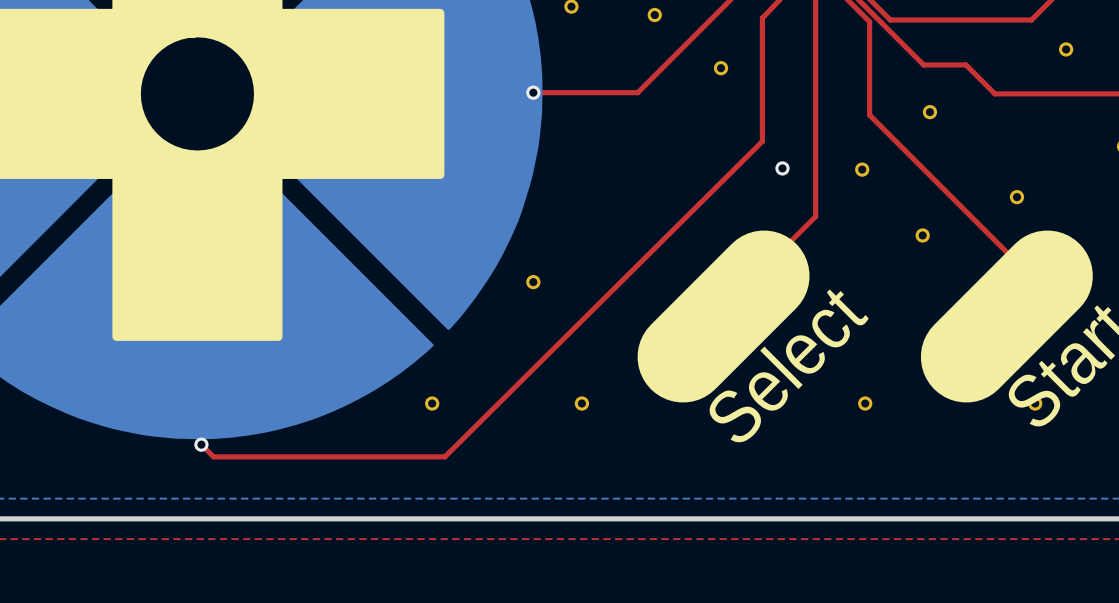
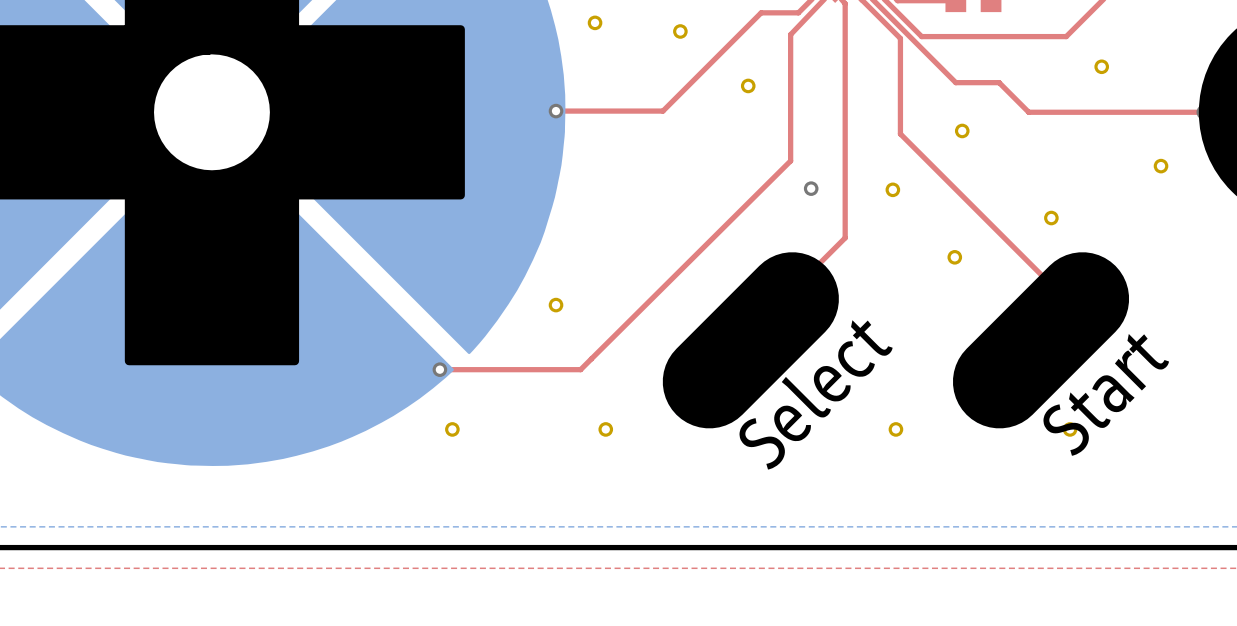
top track: (567, 334) (444, 456) (213, 456) (201, 444) -> (591, 358) (580, 369) (439, 369)
via: none -> (439, 369)
via: (201, 444) -> none

